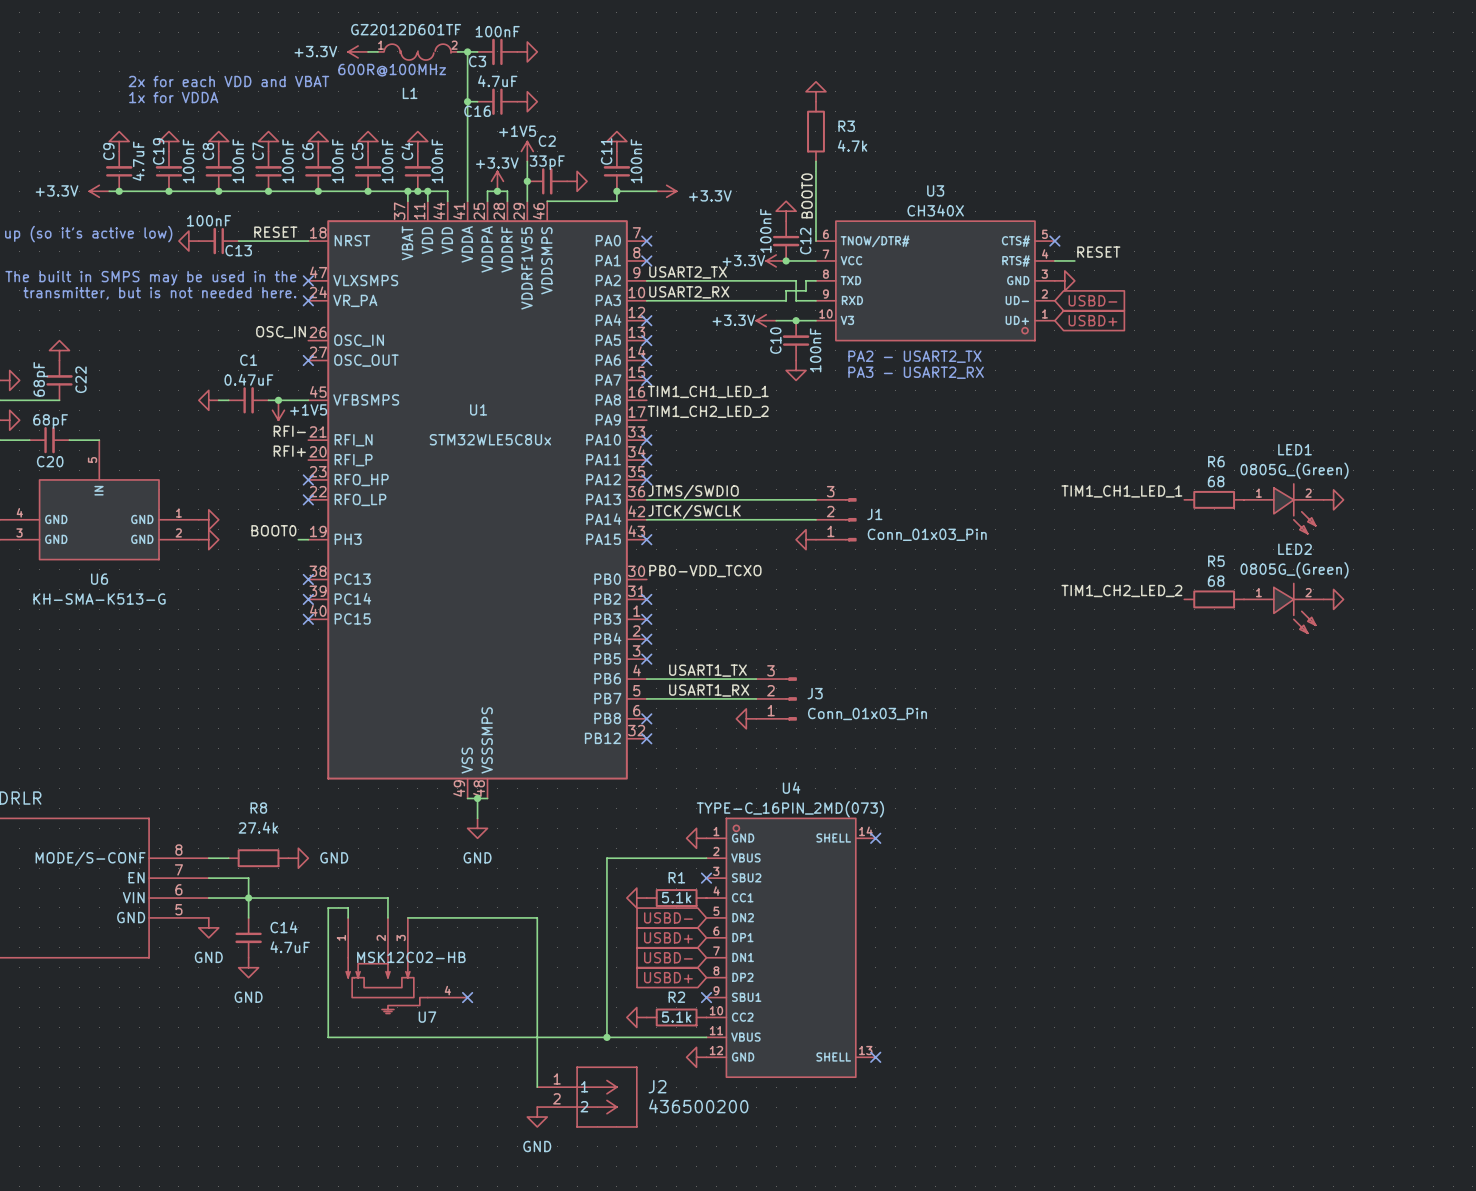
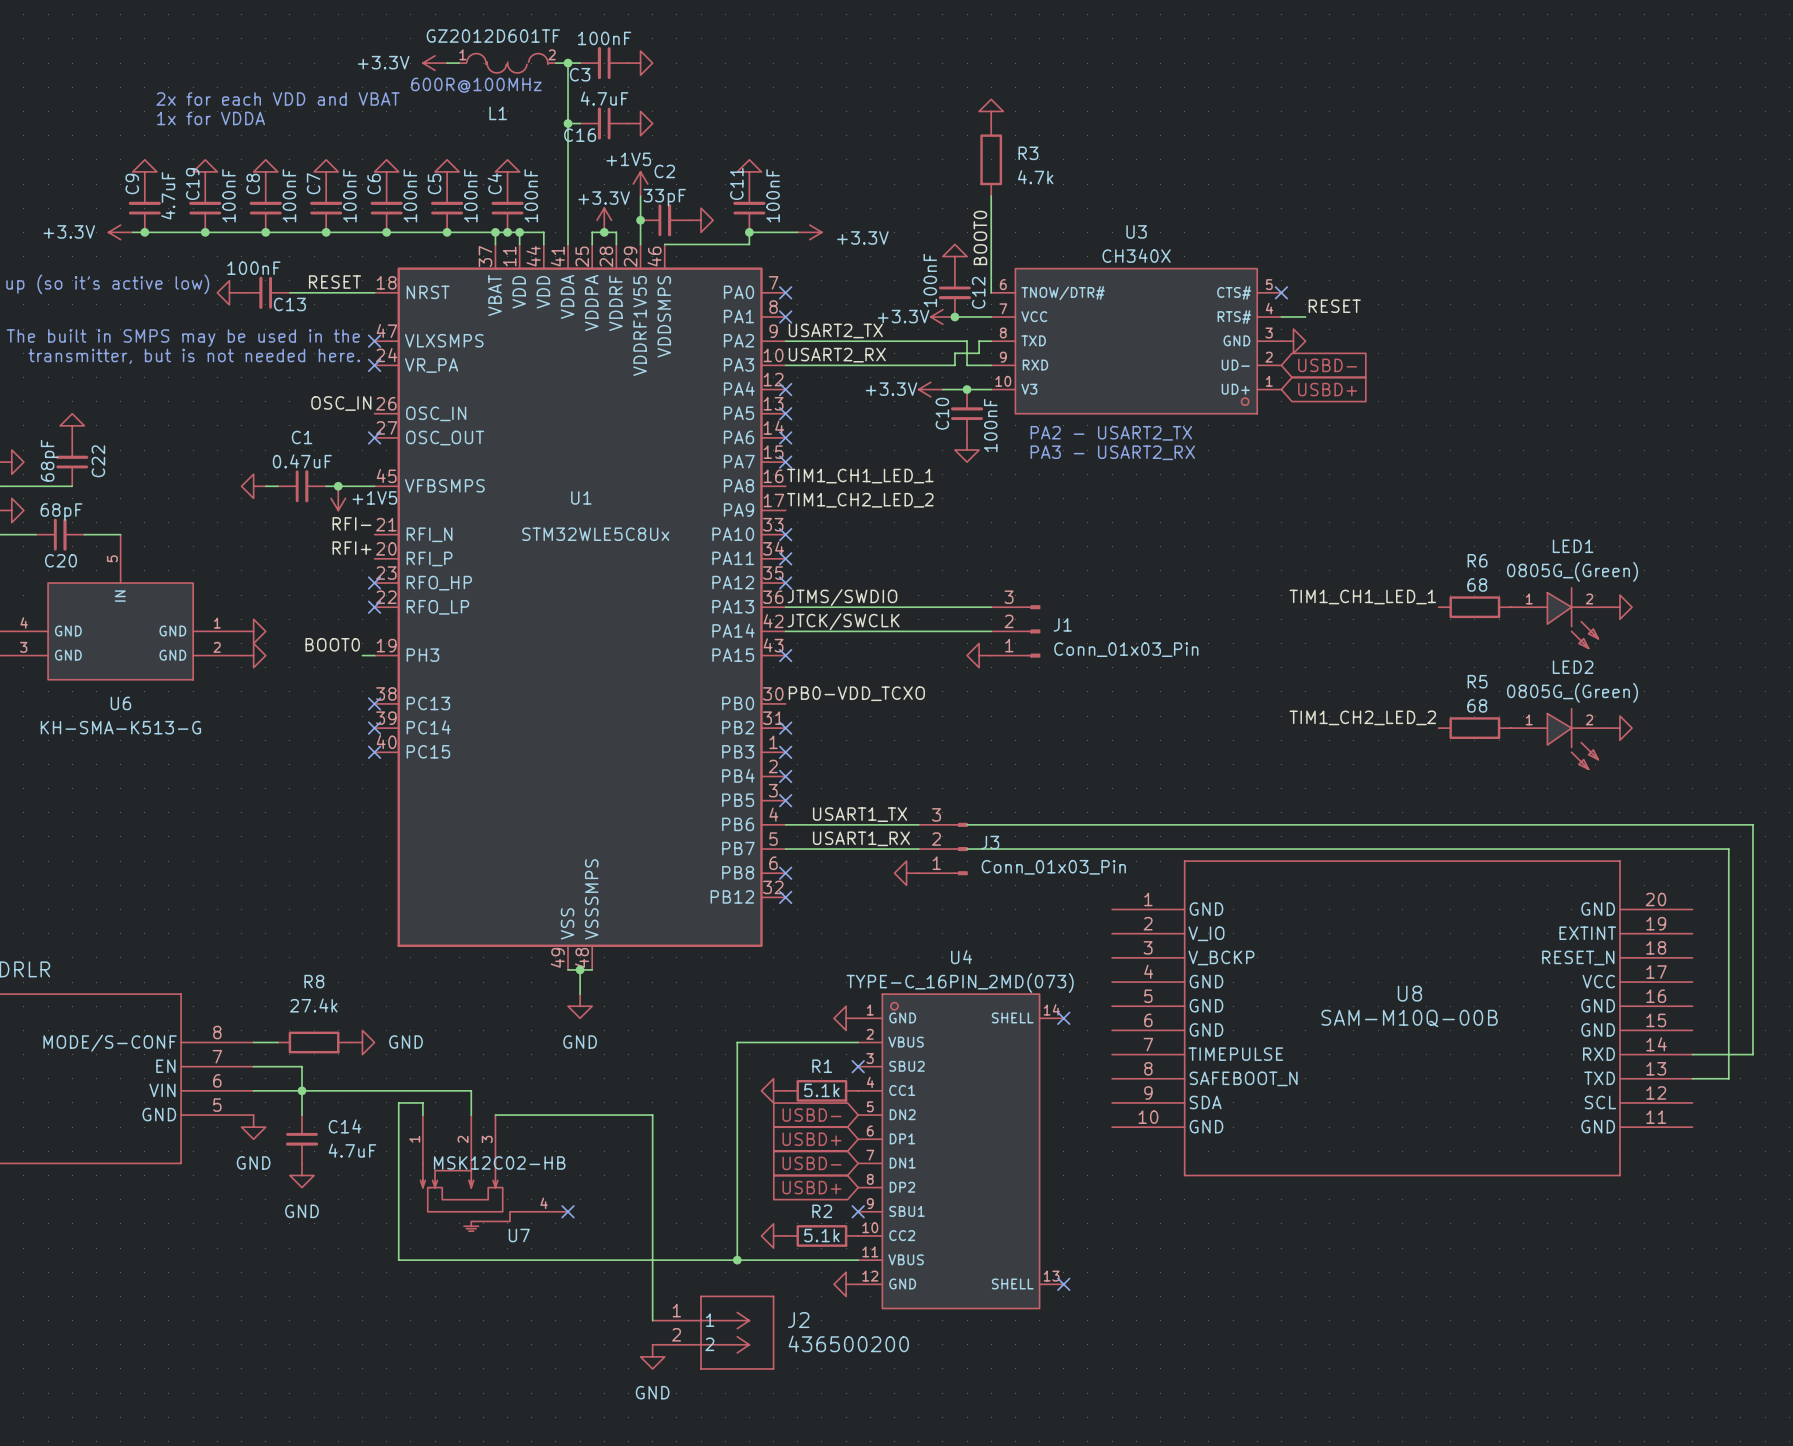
wire: none -> (967, 824) (1752, 824) (1752, 1054) (1692, 1054)
wire: none -> (967, 849) (1728, 849) (1728, 1078) (1692, 1078)
U8: none -> SAM-M10Q-00B (1402, 1018)

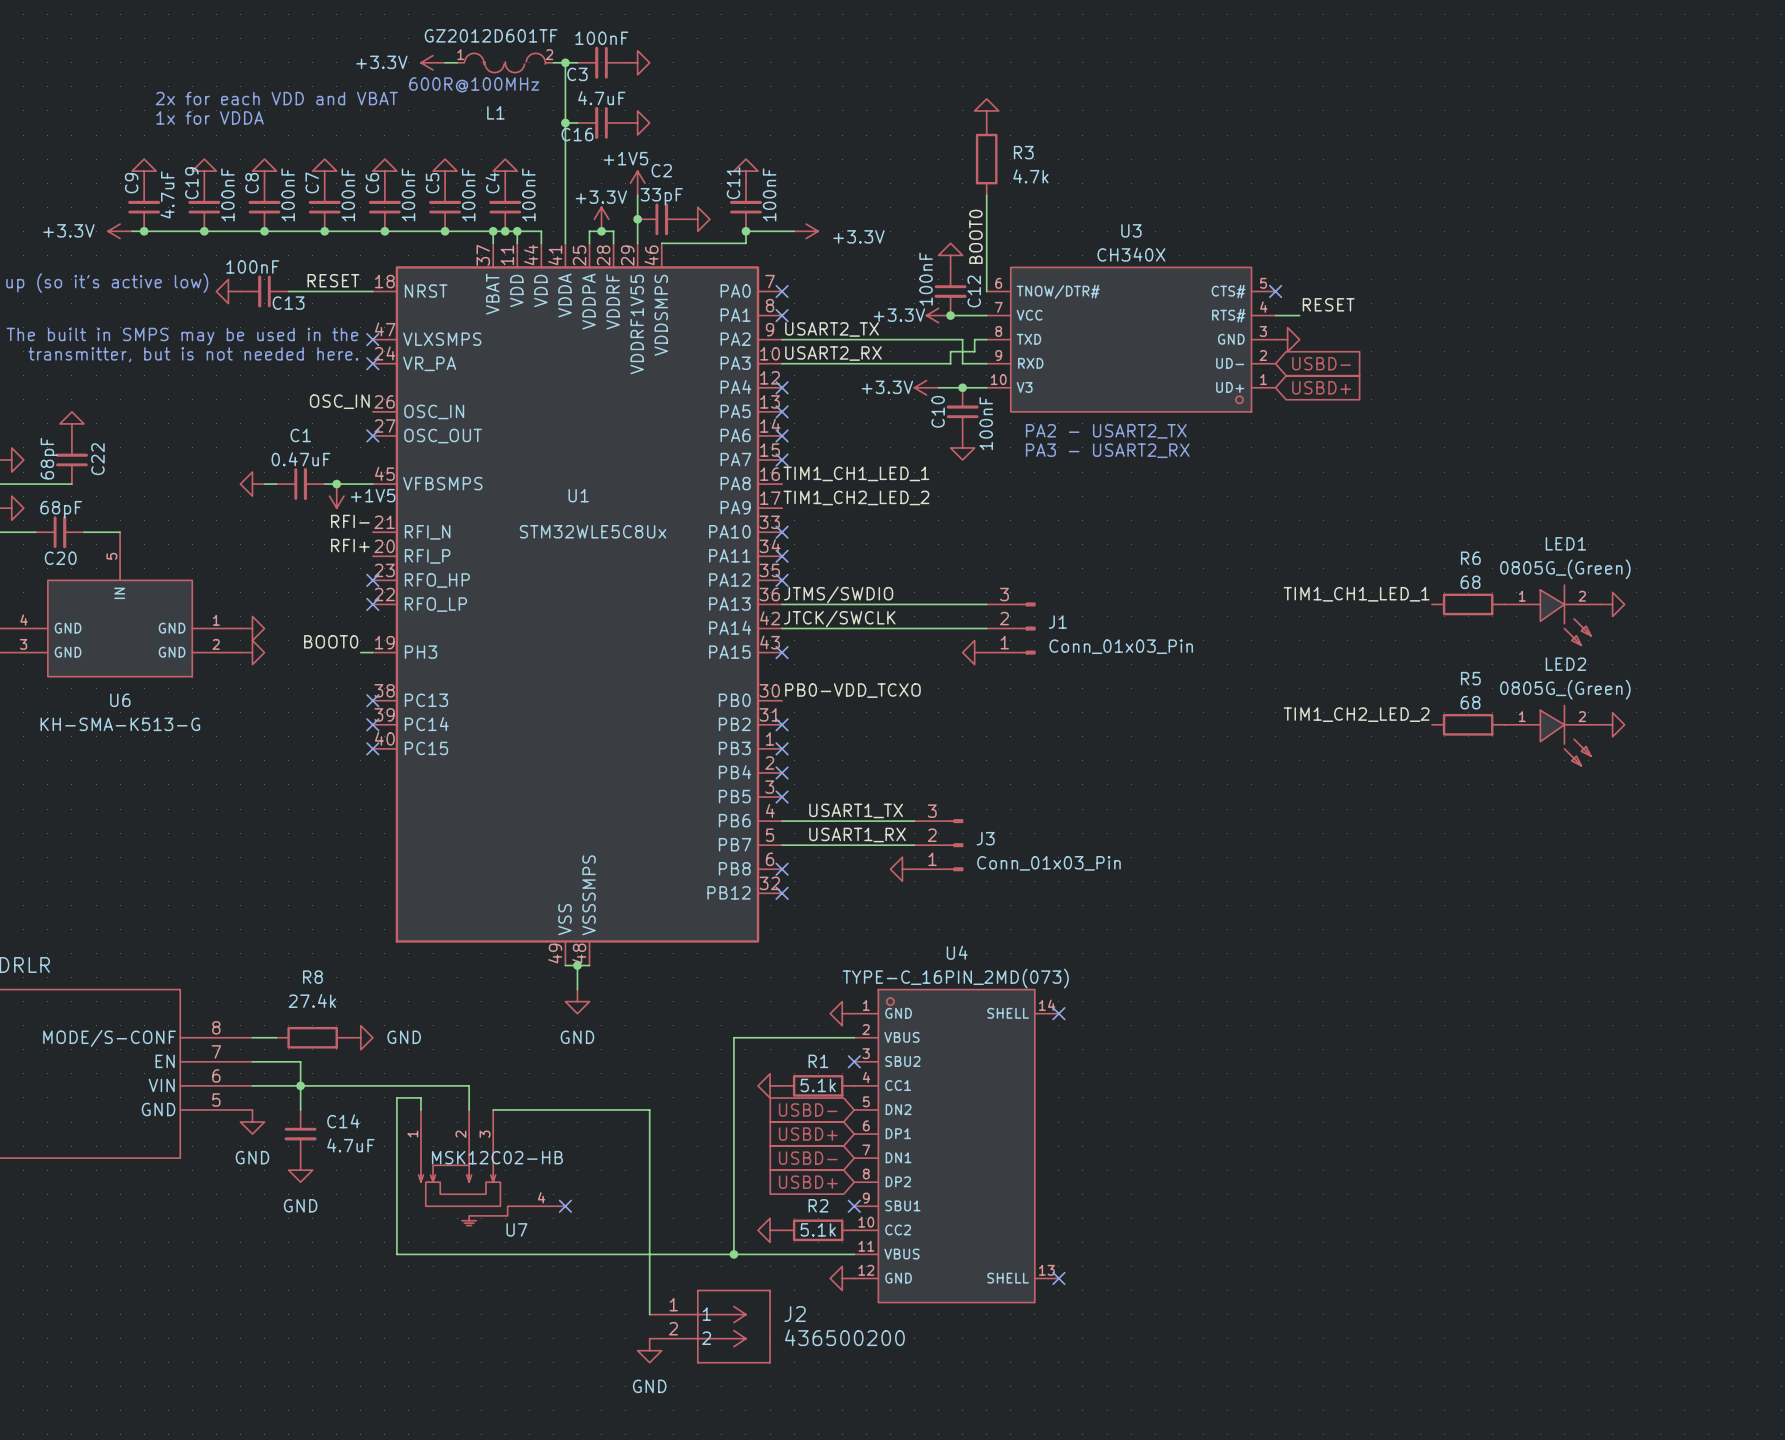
wire: (967, 824) (1752, 824) (1752, 1054) (1692, 1054) -> none
wire: (967, 849) (1728, 849) (1728, 1078) (1692, 1078) -> none
U8: SAM-M10Q-00B (1402, 1018) -> none

